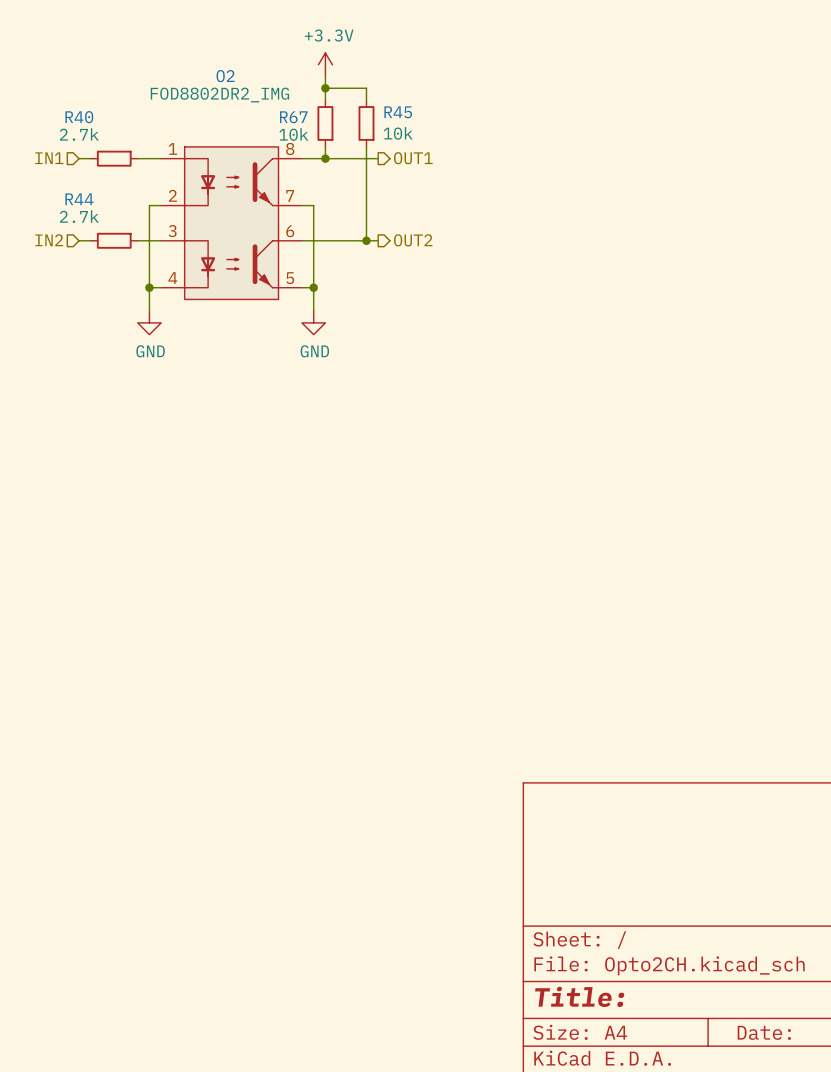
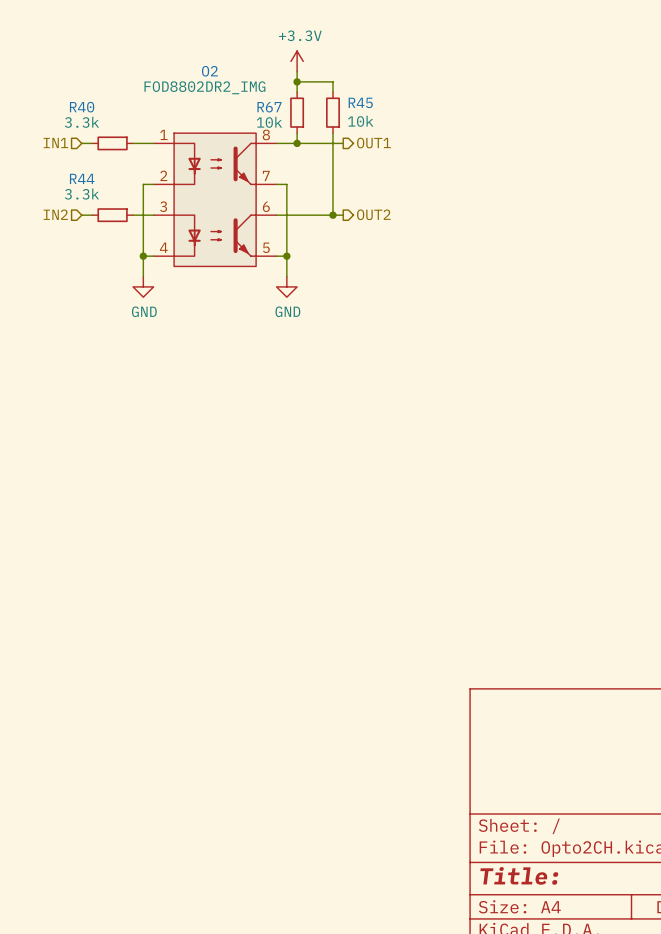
R40 value: 2.7k (79, 134) -> 3.3k (81, 122)
R44 value: 2.7k (79, 216) -> 3.3k (81, 194)

